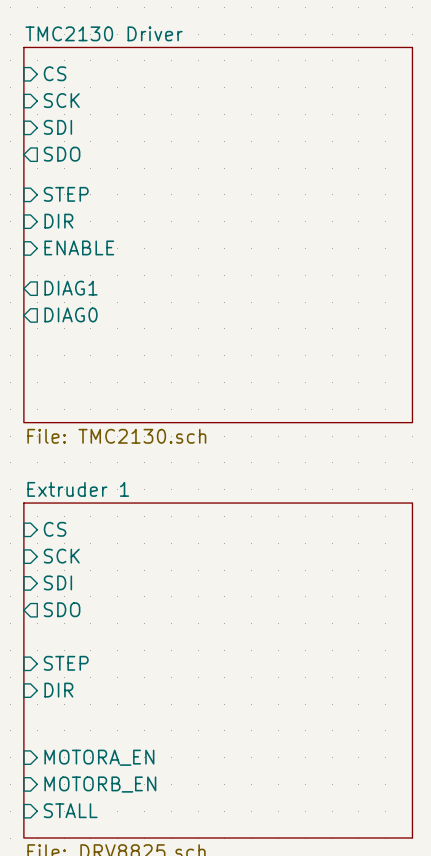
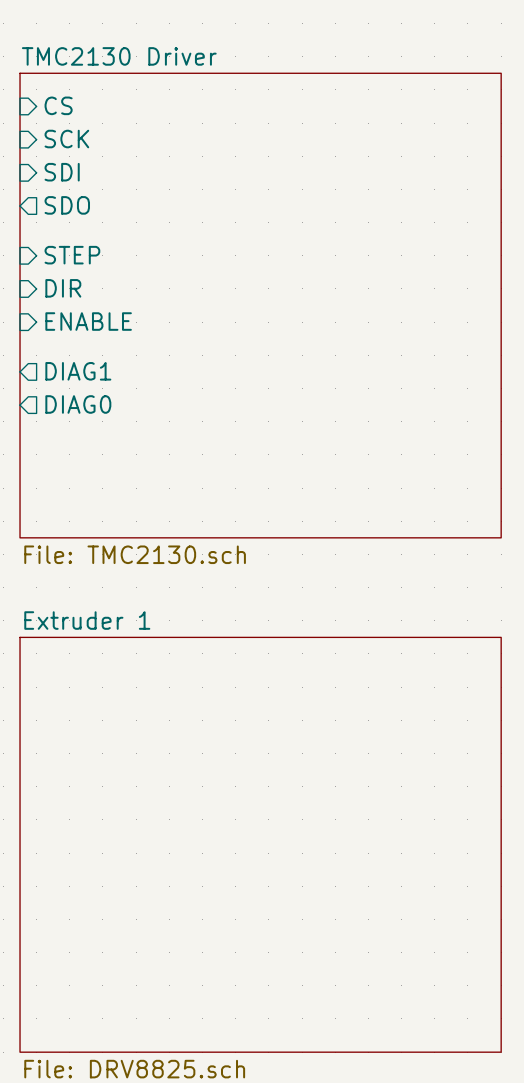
sheet pin: CS (55, 529) -> none
sheet pin: SCK (61, 556) -> none
sheet pin: SDI (57, 582) -> none
sheet pin: SDO (62, 609) -> none
sheet pin: STEP (66, 663) -> none
sheet pin: DIR (58, 690) -> none
sheet pin: MOTORA_EN (99, 757) -> none
sheet pin: MOTORB_EN (100, 784) -> none
sheet pin: STALL (70, 810) -> none

